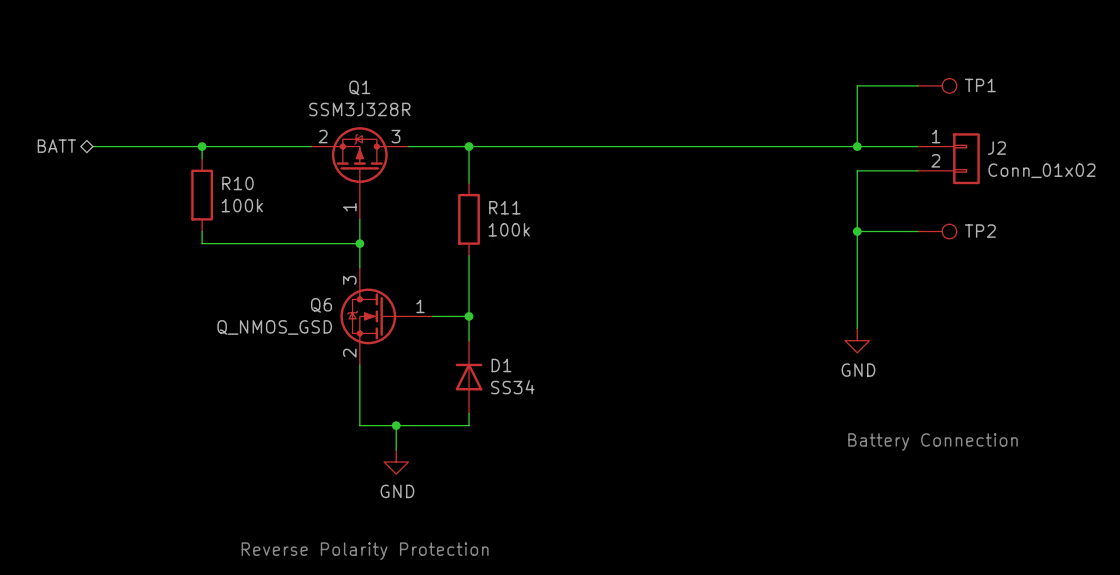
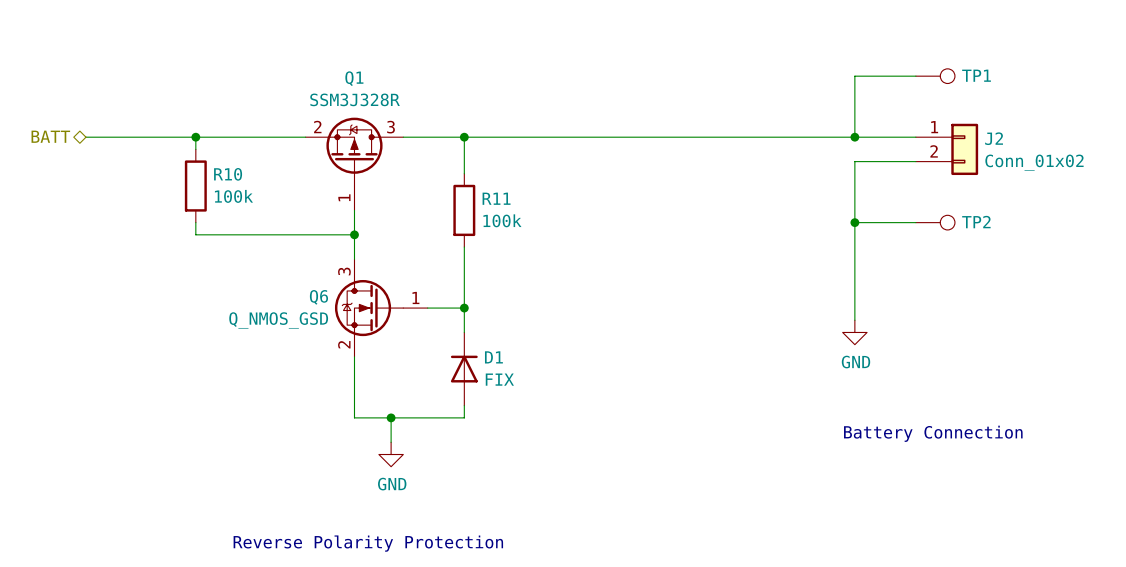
D1 value: SS34 (512, 387) -> FIX (499, 379)

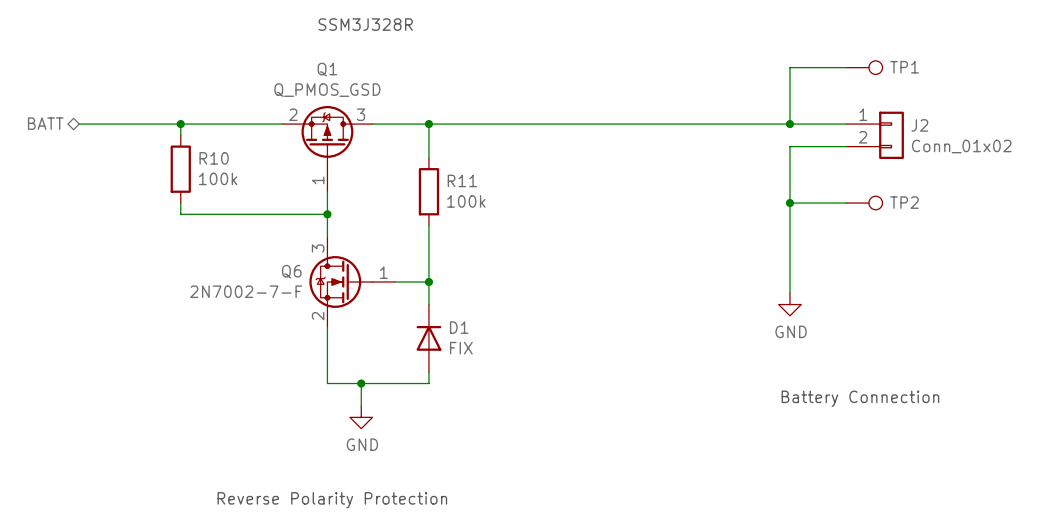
text: none -> SSM3J328R (365, 24)
Q1 value: SSM3J328R (355, 99) -> Q_PMOS_GSD (327, 90)
Q6 value: Q_NMOS_GSD (278, 320) -> 2N7002-7-F (246, 291)

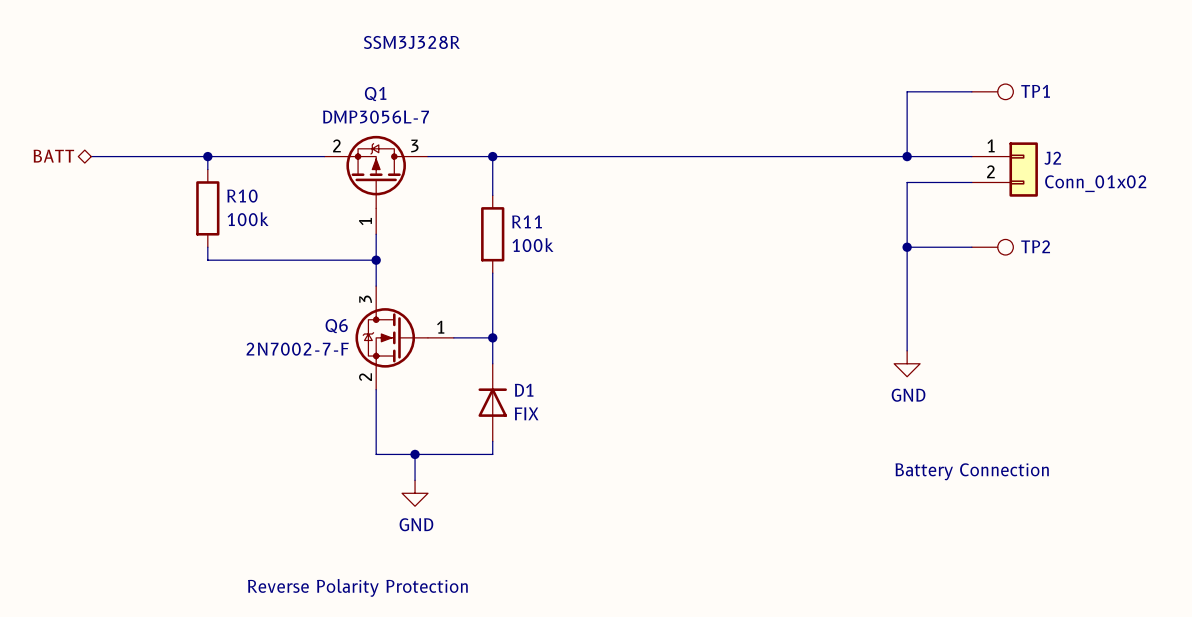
Q1 text: none -> DMP3056L-7 (376, 117)
Q1 value: Q_PMOS_GSD (327, 90) -> none

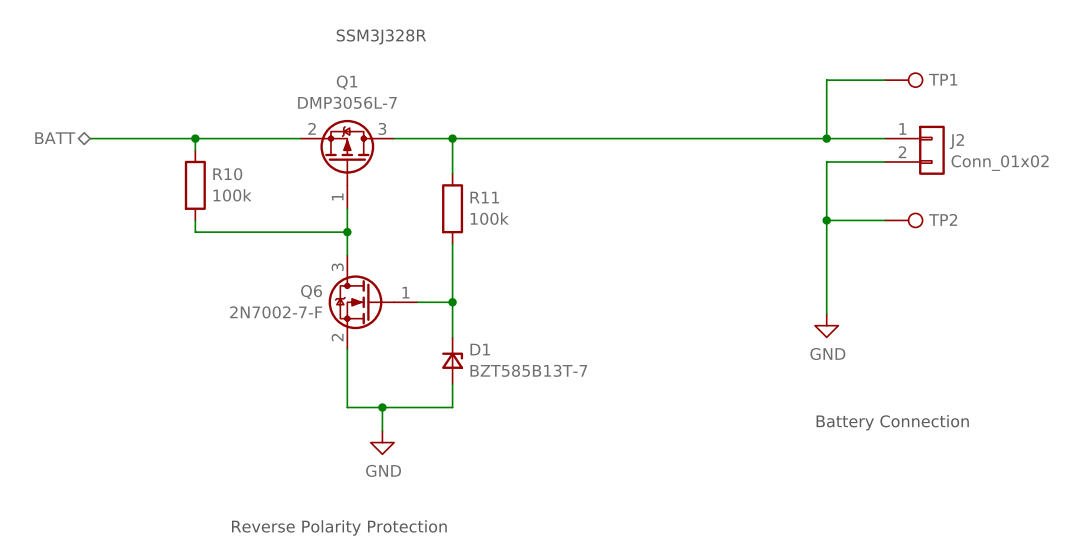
D1 symbol: [478, 363, 507, 442] -> [442, 337, 464, 385]
D1 value: FIX (526, 413) -> BZT585B13T-7 (528, 370)

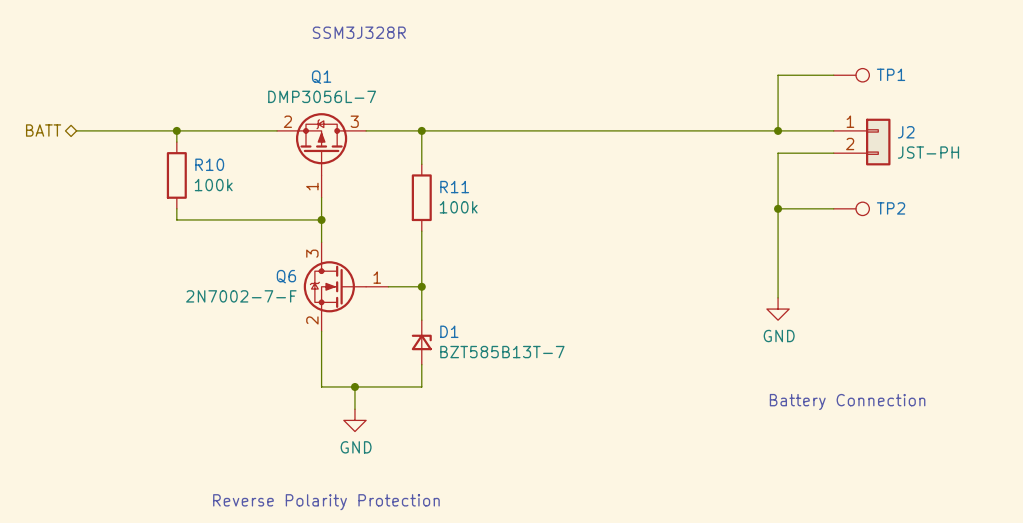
J2 value: Conn_01x02 (1000, 163) -> JST-PH (928, 152)

